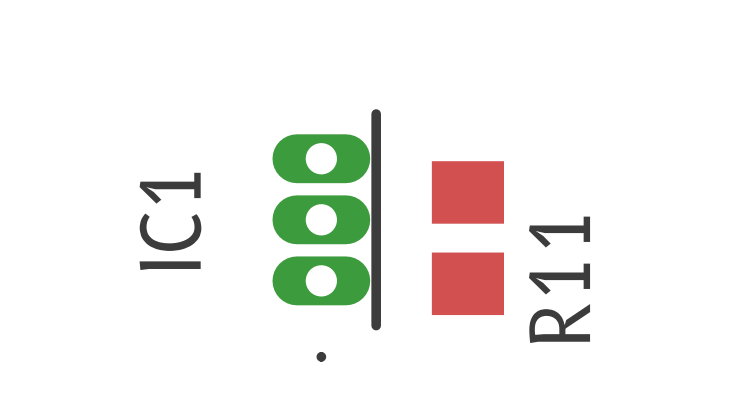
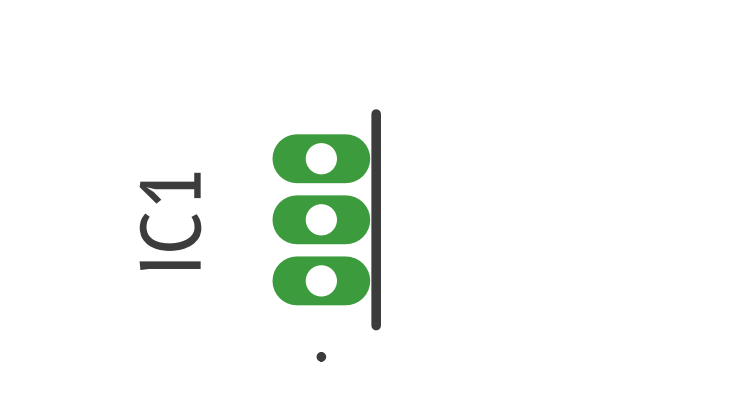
R11: (467, 238) -> none

